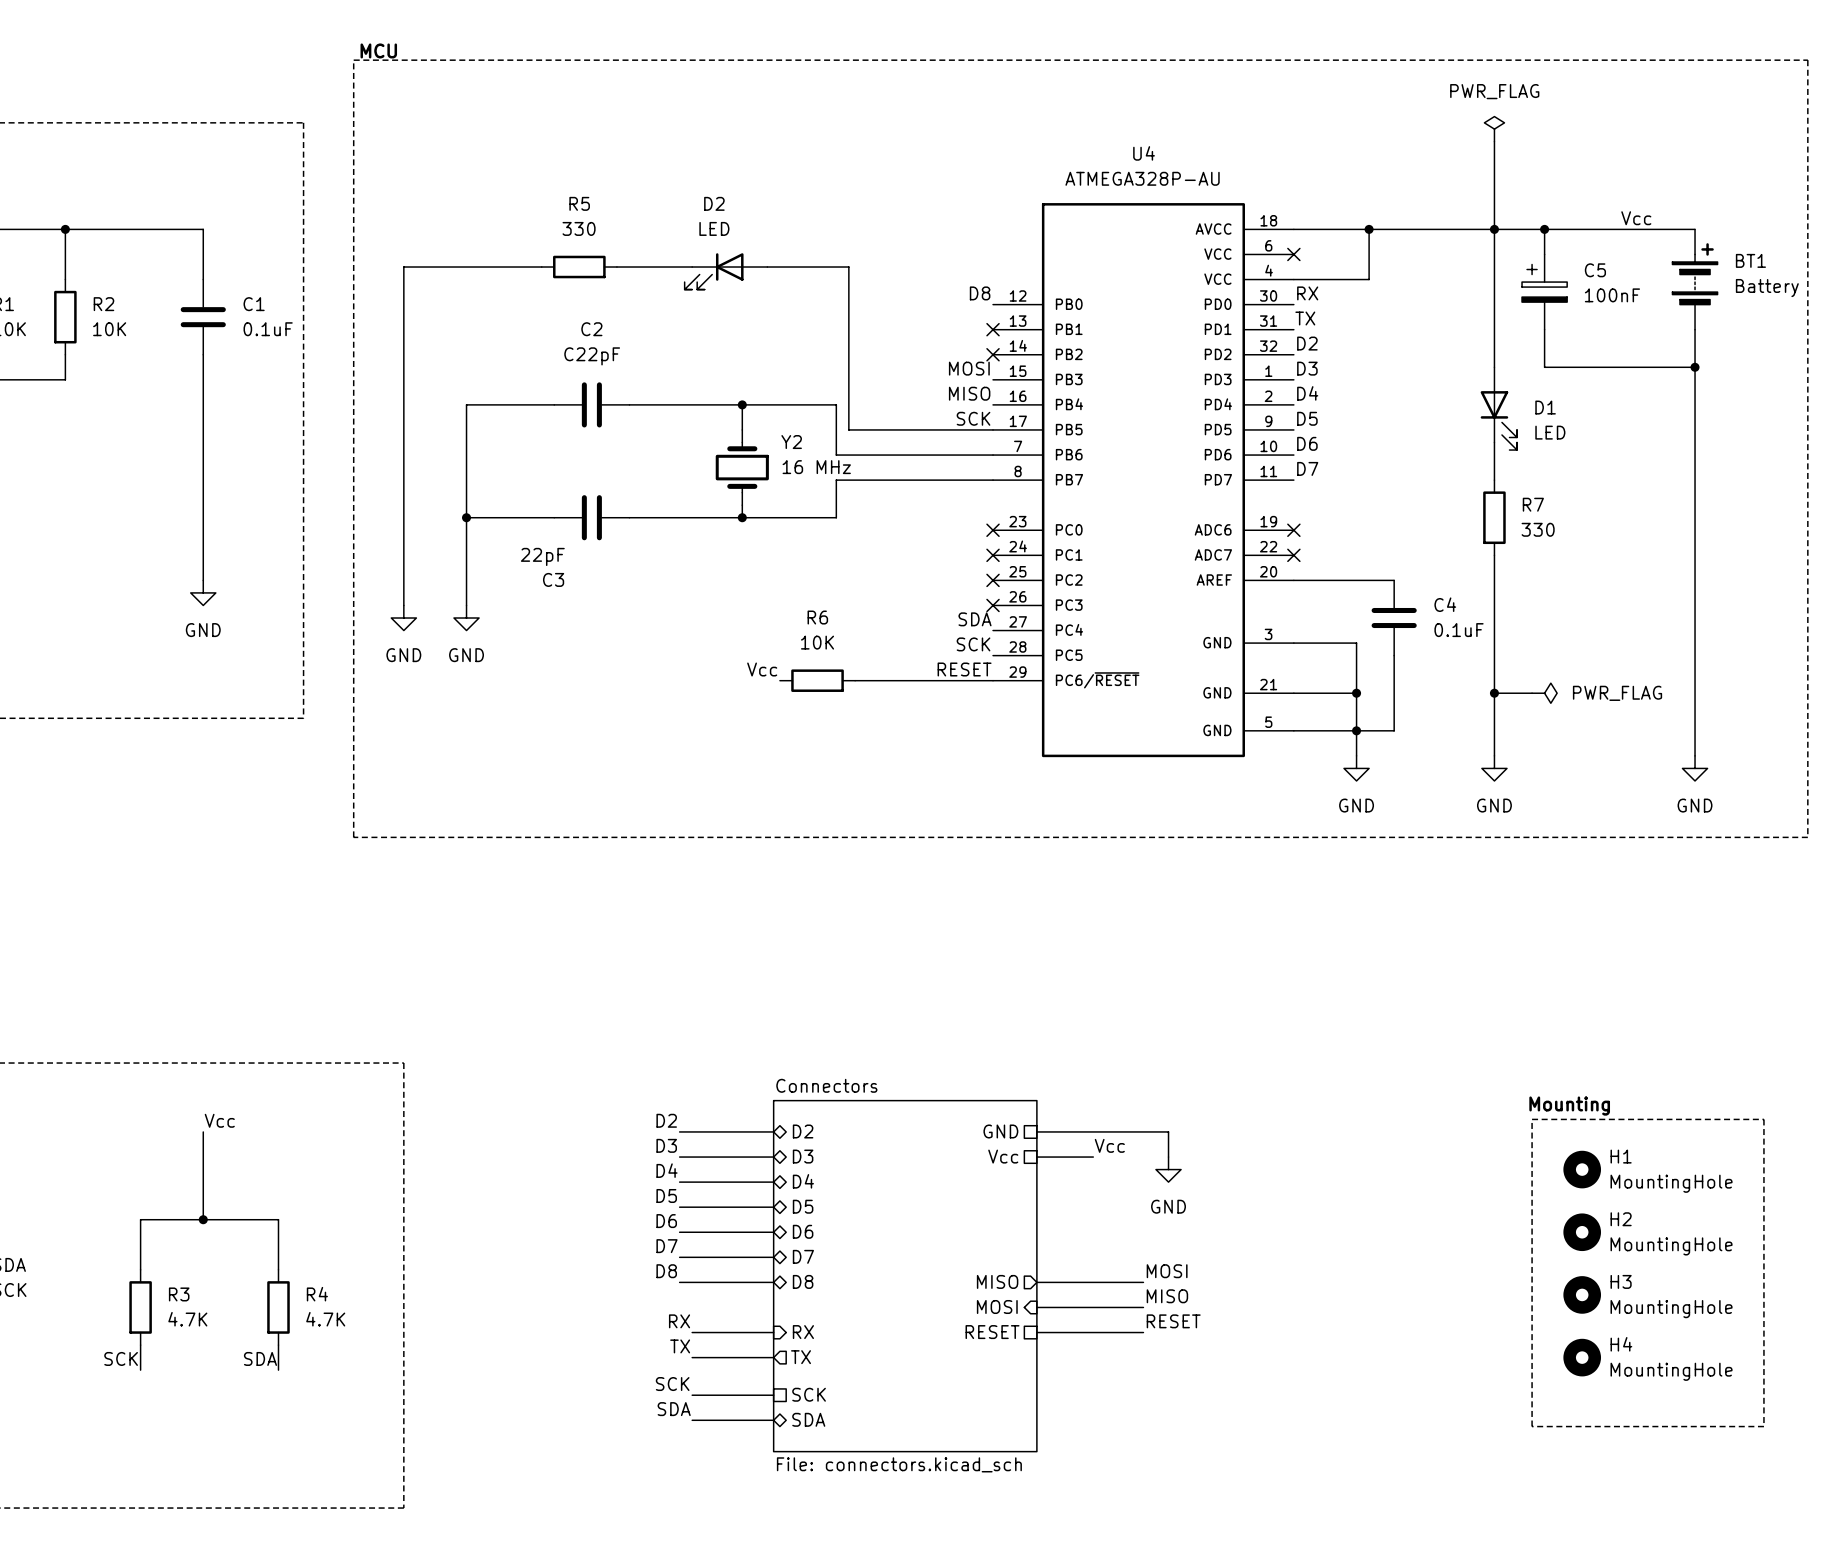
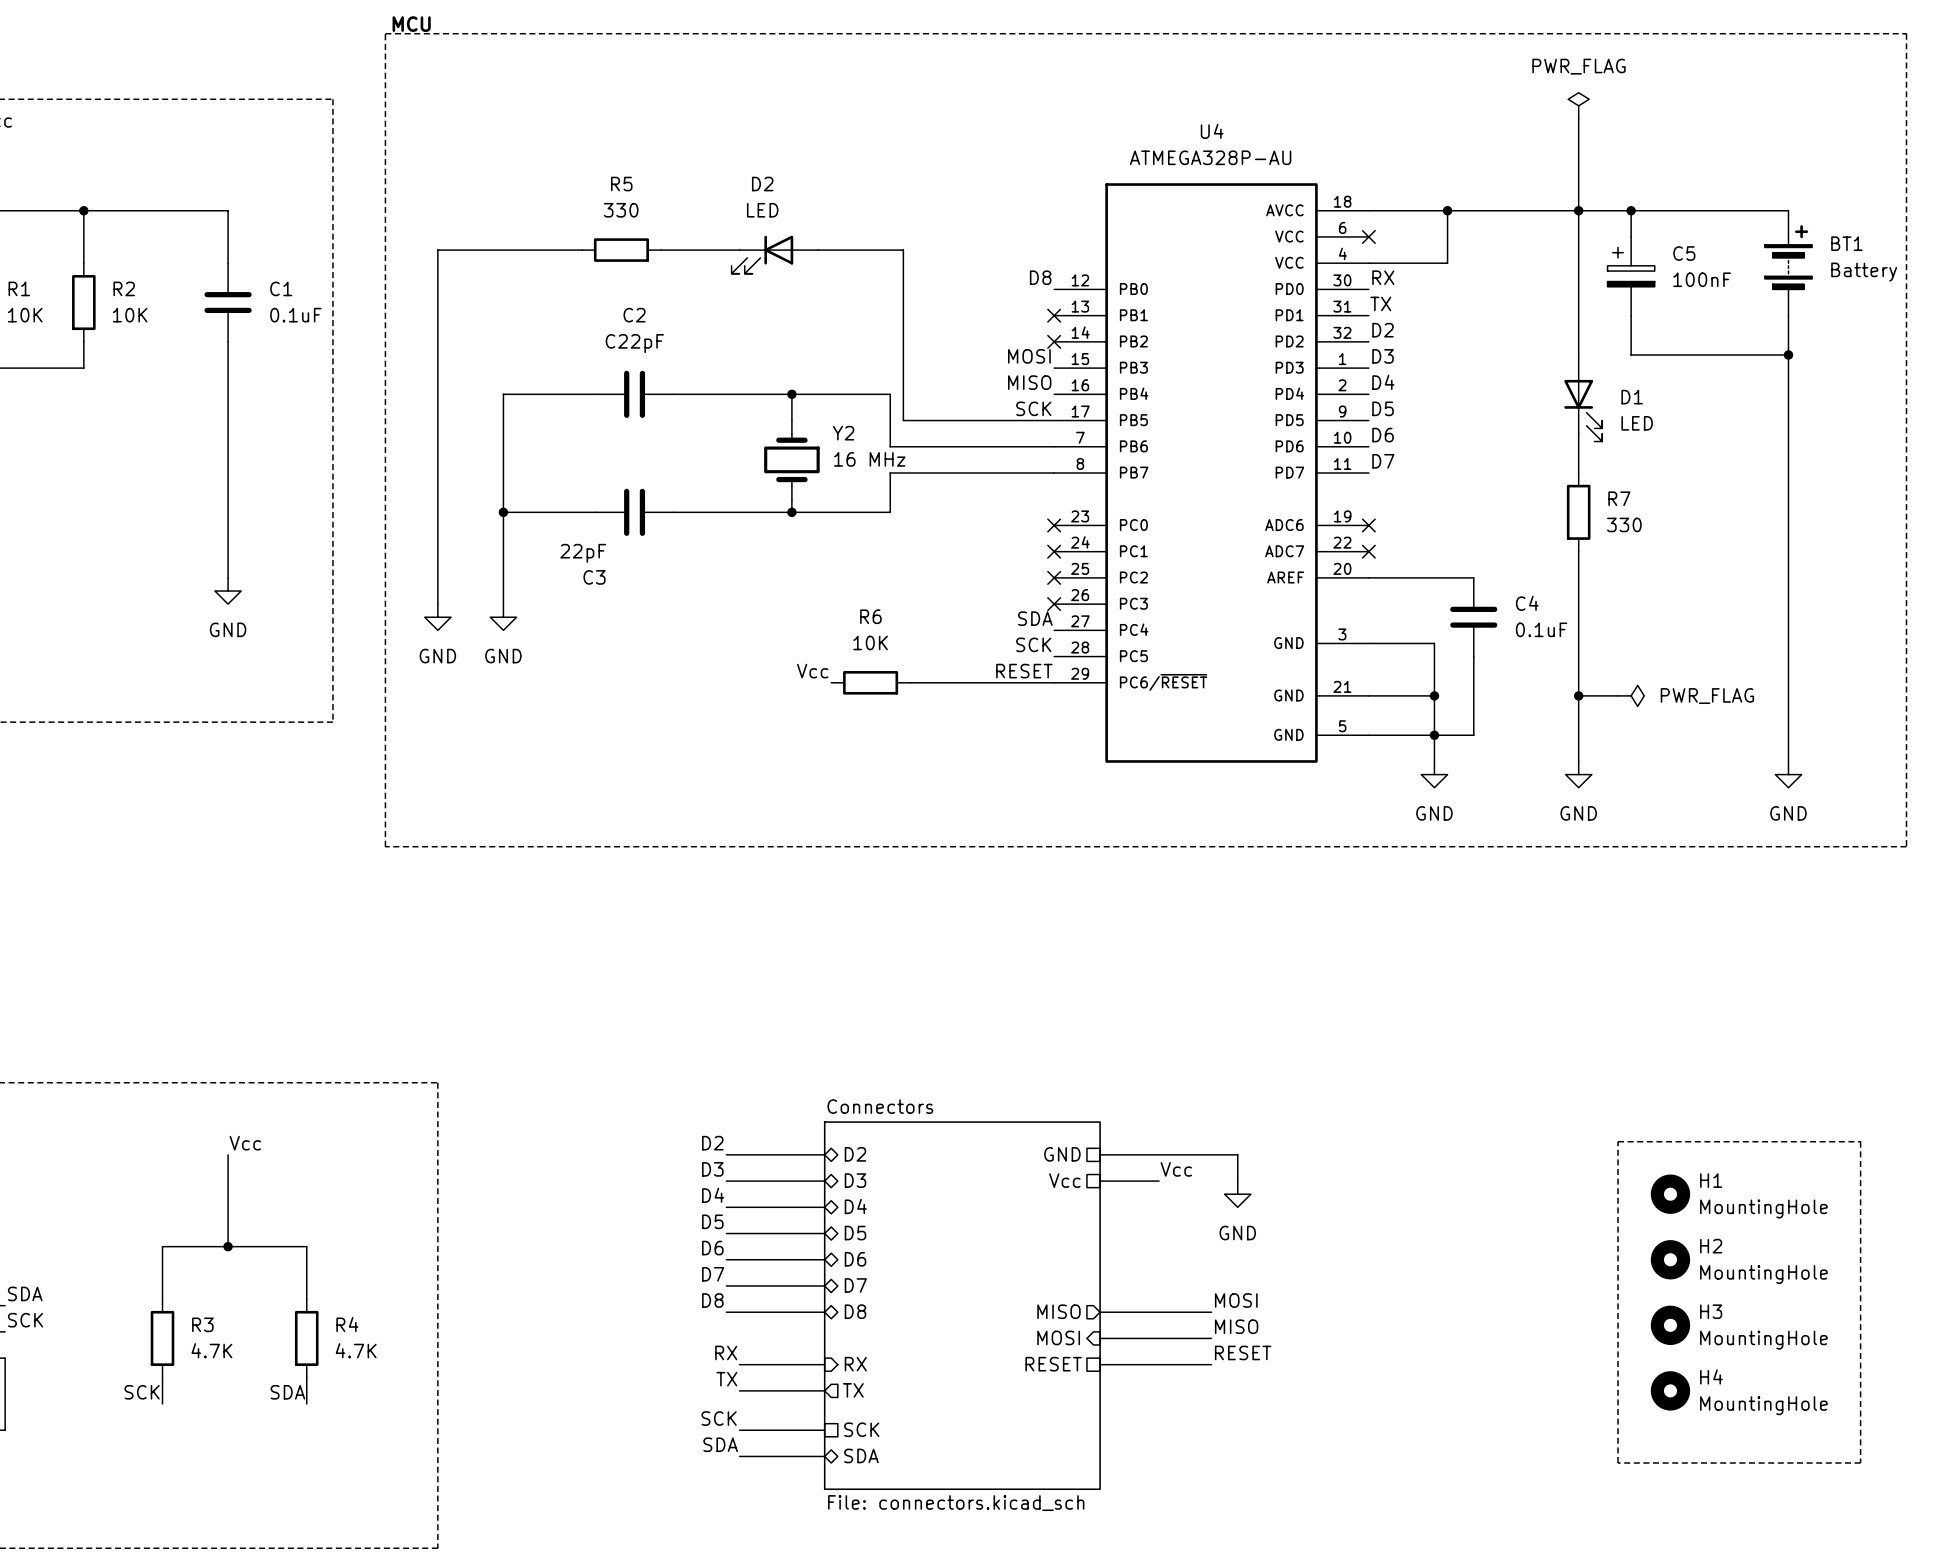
label: Vcc (1636, 218) -> none
text: Mounting (1569, 1106) -> none

